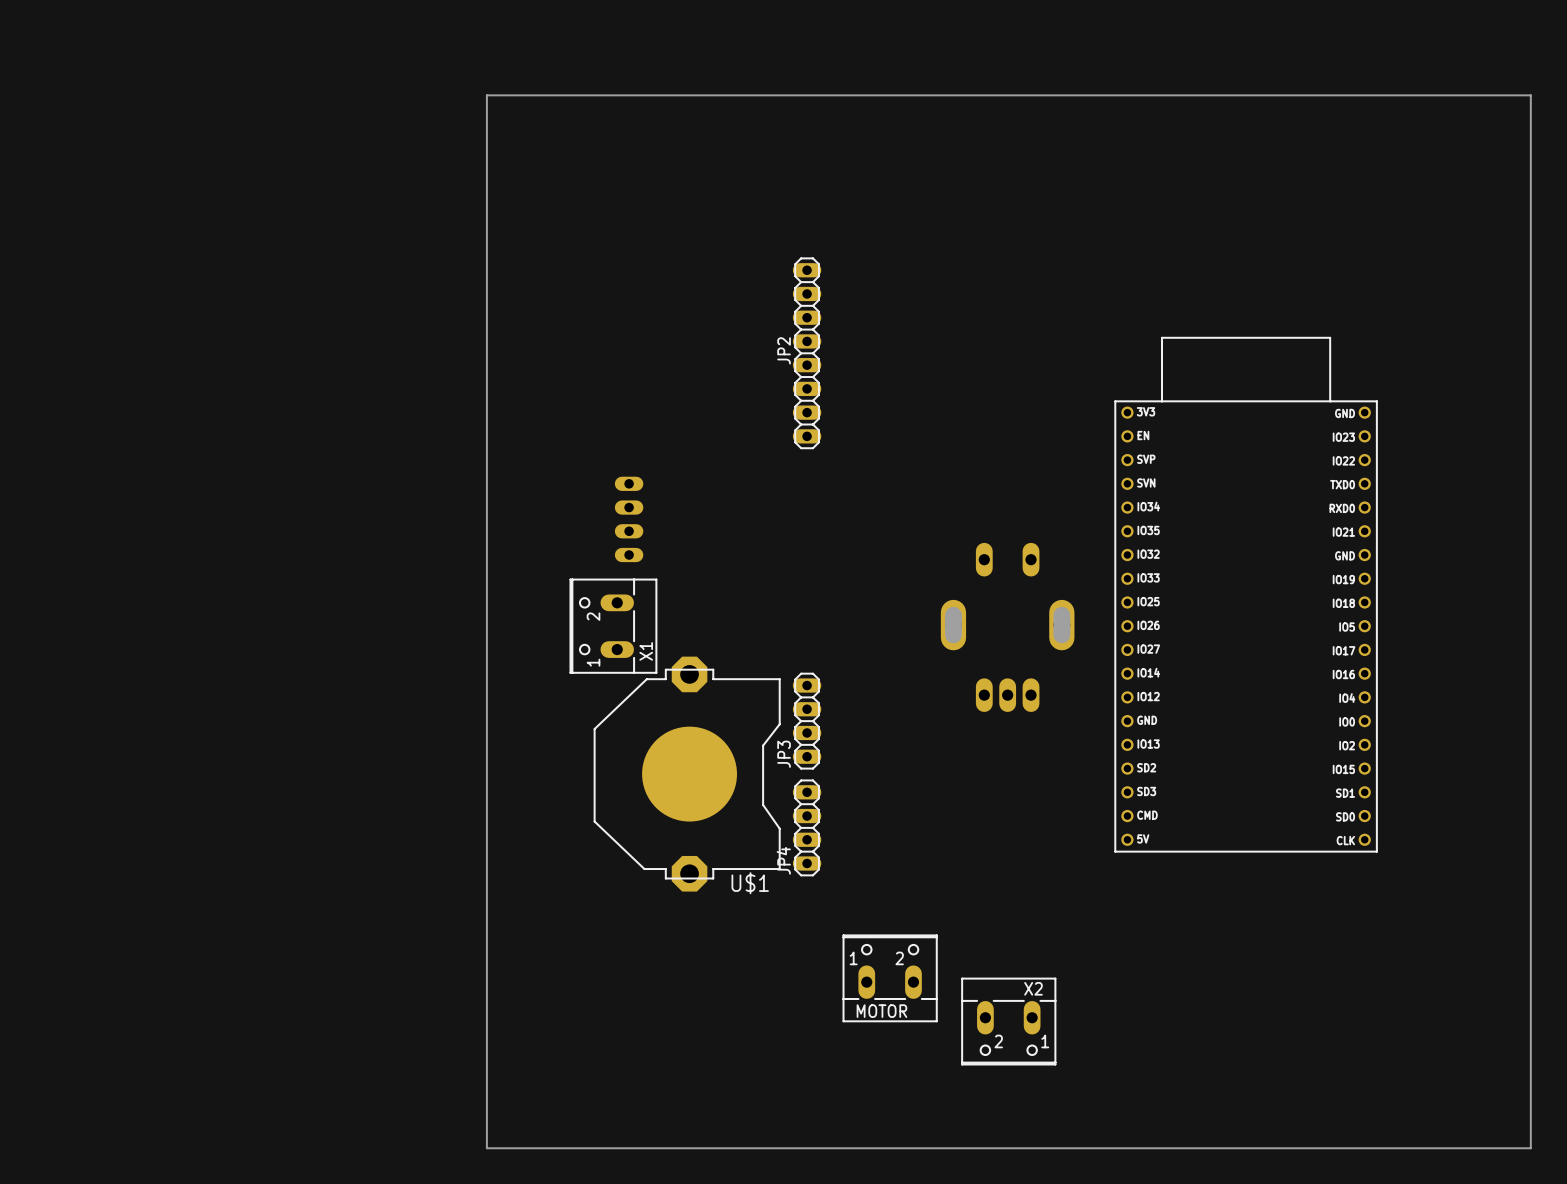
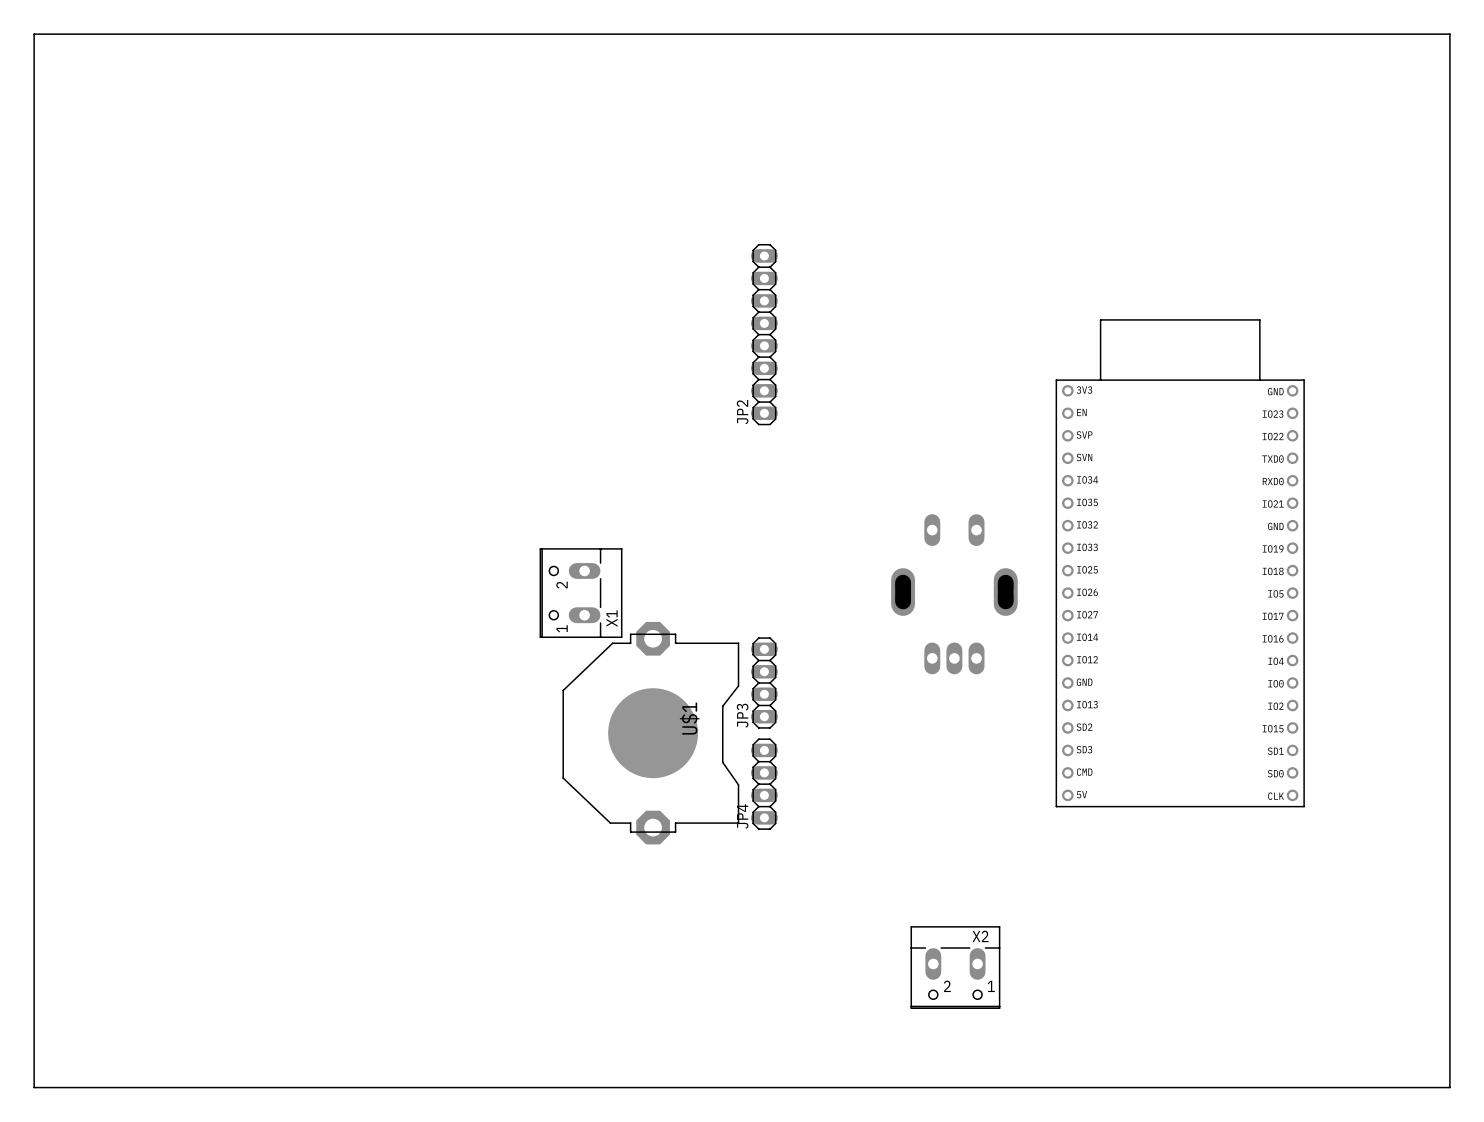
board edge: (1530, 95) (486, 95) (486, 1148) -> (1449, 90) (1449, 34) (34, 34) (34, 1087) (461, 1087)
JP2 name position: JP2 (784, 350) -> JP2 (742, 412)
part: (629, 519) -> none
U$1 name rotation: 0° (750, 883) -> 90° counterclockwise (689, 718)
U$1 name position: U$1 (750, 883) -> U$1 (689, 718)
MOTOR: (890, 978) -> none

